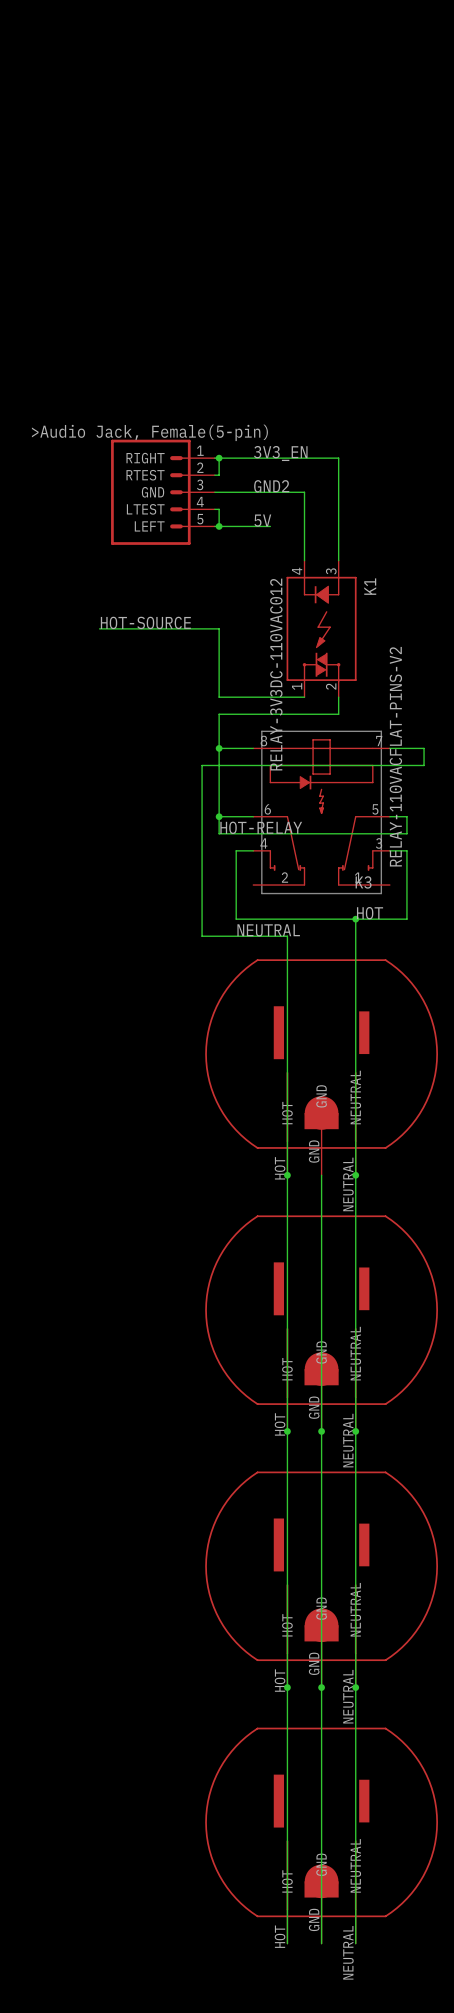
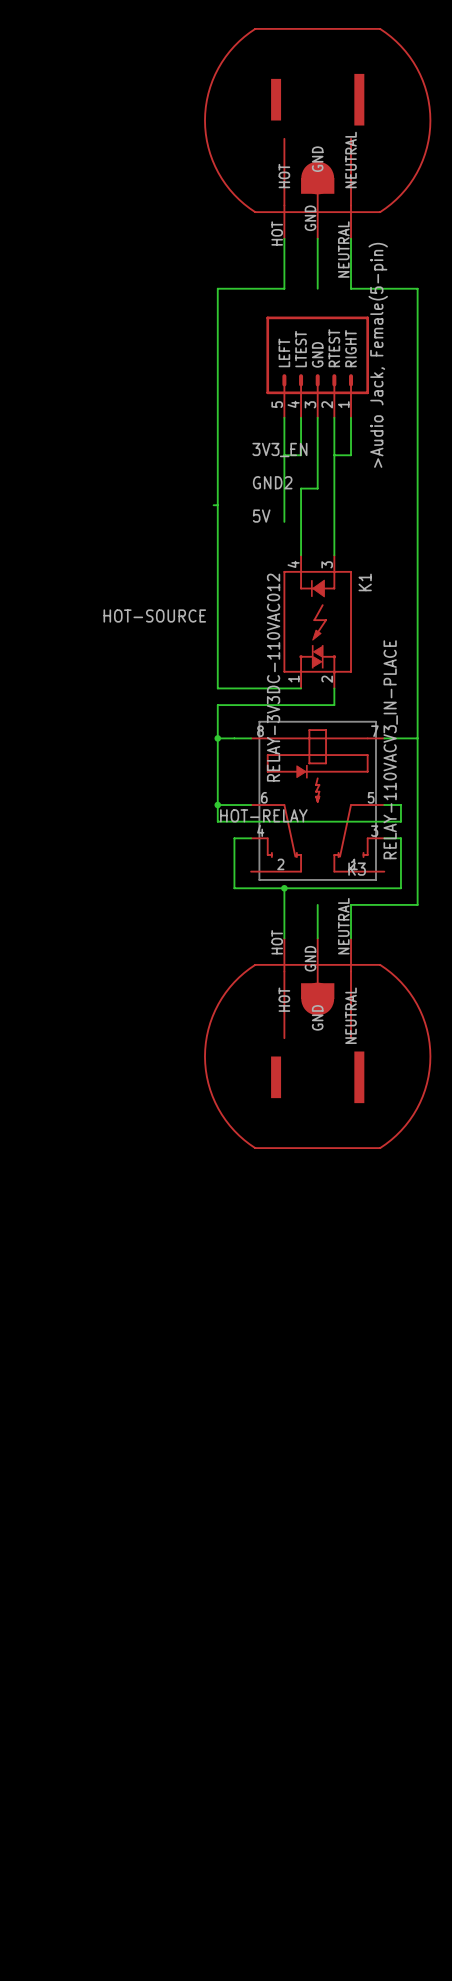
part: none -> (317, 133)
wire: none -> (284, 238) (284, 288) (217, 288) (217, 455)
wire: none -> (317, 238) (317, 288)
wire: none -> (351, 238) (351, 288) (417, 288) (417, 738)
part: none -> (317, 367)
wire: none -> (284, 417) (284, 521)
wire: none -> (334, 417) (334, 455) (351, 455) (351, 417)
wire: (214, 458) (287, 458) -> none
junction: (219, 458) -> none
wire: (304, 458) (338, 458) -> (301, 455) (301, 417)
wire: (214, 475) (219, 475) -> (217, 505) (217, 471)
part: (162, 492) -> none
wire: (214, 492) (304, 492) -> (317, 417) (317, 488) (301, 488)
wire: (214, 526) (270, 526) -> none
junction: (219, 526) -> none
wire: (99, 628) (219, 628) -> (217, 521) (217, 621)
K3 value: RELAY-110VACFLAT-PINS-V2 (395, 756) -> RELAY-110VACV3_IN-PLACE (390, 749)
wire: (424, 765) (202, 765) (202, 936) (287, 936) -> (417, 755) (417, 904) (400, 904)
wire: (236, 902) (236, 919) (355, 919) -> (234, 888) (400, 888)
wire: none -> (284, 888) (284, 921)
junction: none -> (284, 888)
wire: (406, 902) (406, 919) -> none
label: HOT (370, 913) -> none
wire: none -> (317, 904) (317, 938)
junction: (355, 919) -> none
label: NEUTRAL (268, 930) -> none
wire: (287, 953) (287, 1943) -> none
wire: (355, 953) (355, 1943) -> none
part symbol: [205, 959, 438, 1176] -> [204, 938, 432, 1149]
junction: (287, 1175) -> none
wire: (321, 1175) (321, 1943) -> none
junction: (355, 1175) -> none
part: (321, 1323) -> none
junction: (287, 1431) -> none
junction: (321, 1431) -> none
junction: (355, 1431) -> none
part: (321, 1579) -> none
junction: (287, 1687) -> none
junction: (321, 1687) -> none
junction: (355, 1687) -> none
part: (321, 1835) -> none

